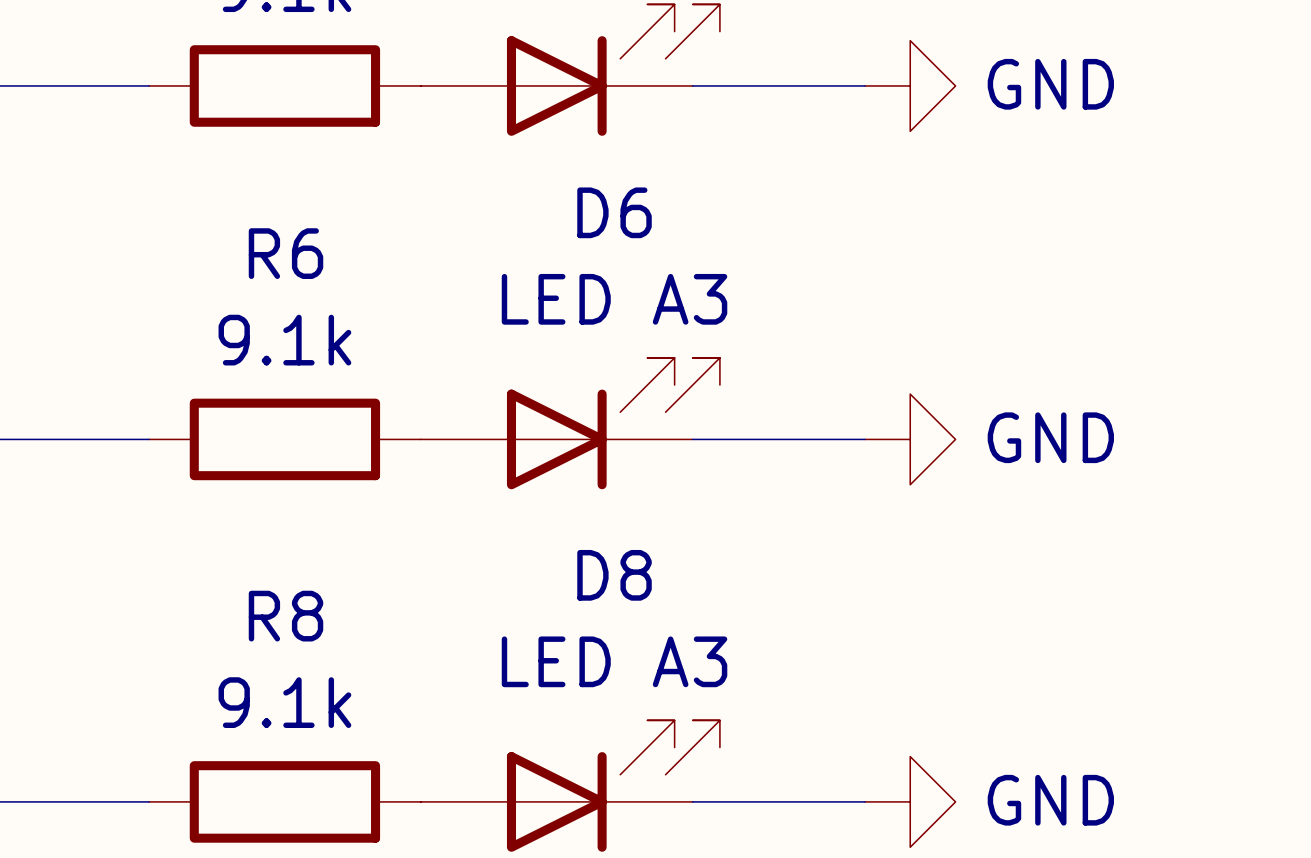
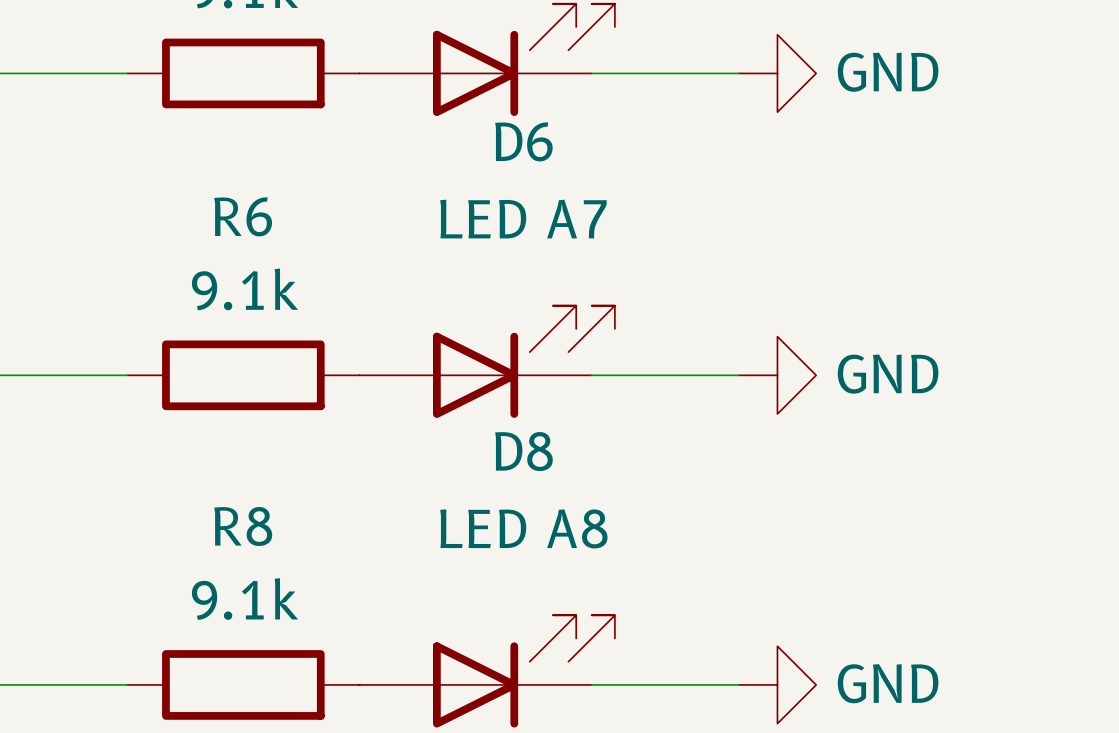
D6 name position: D6 (614, 212) -> D6 (523, 141)
D6 value: LED A3 (614, 299) -> LED A7 (523, 219)
D8 name position: D8 (614, 575) -> D8 (523, 451)
D8 value: LED A3 (614, 661) -> LED A8 (523, 528)

